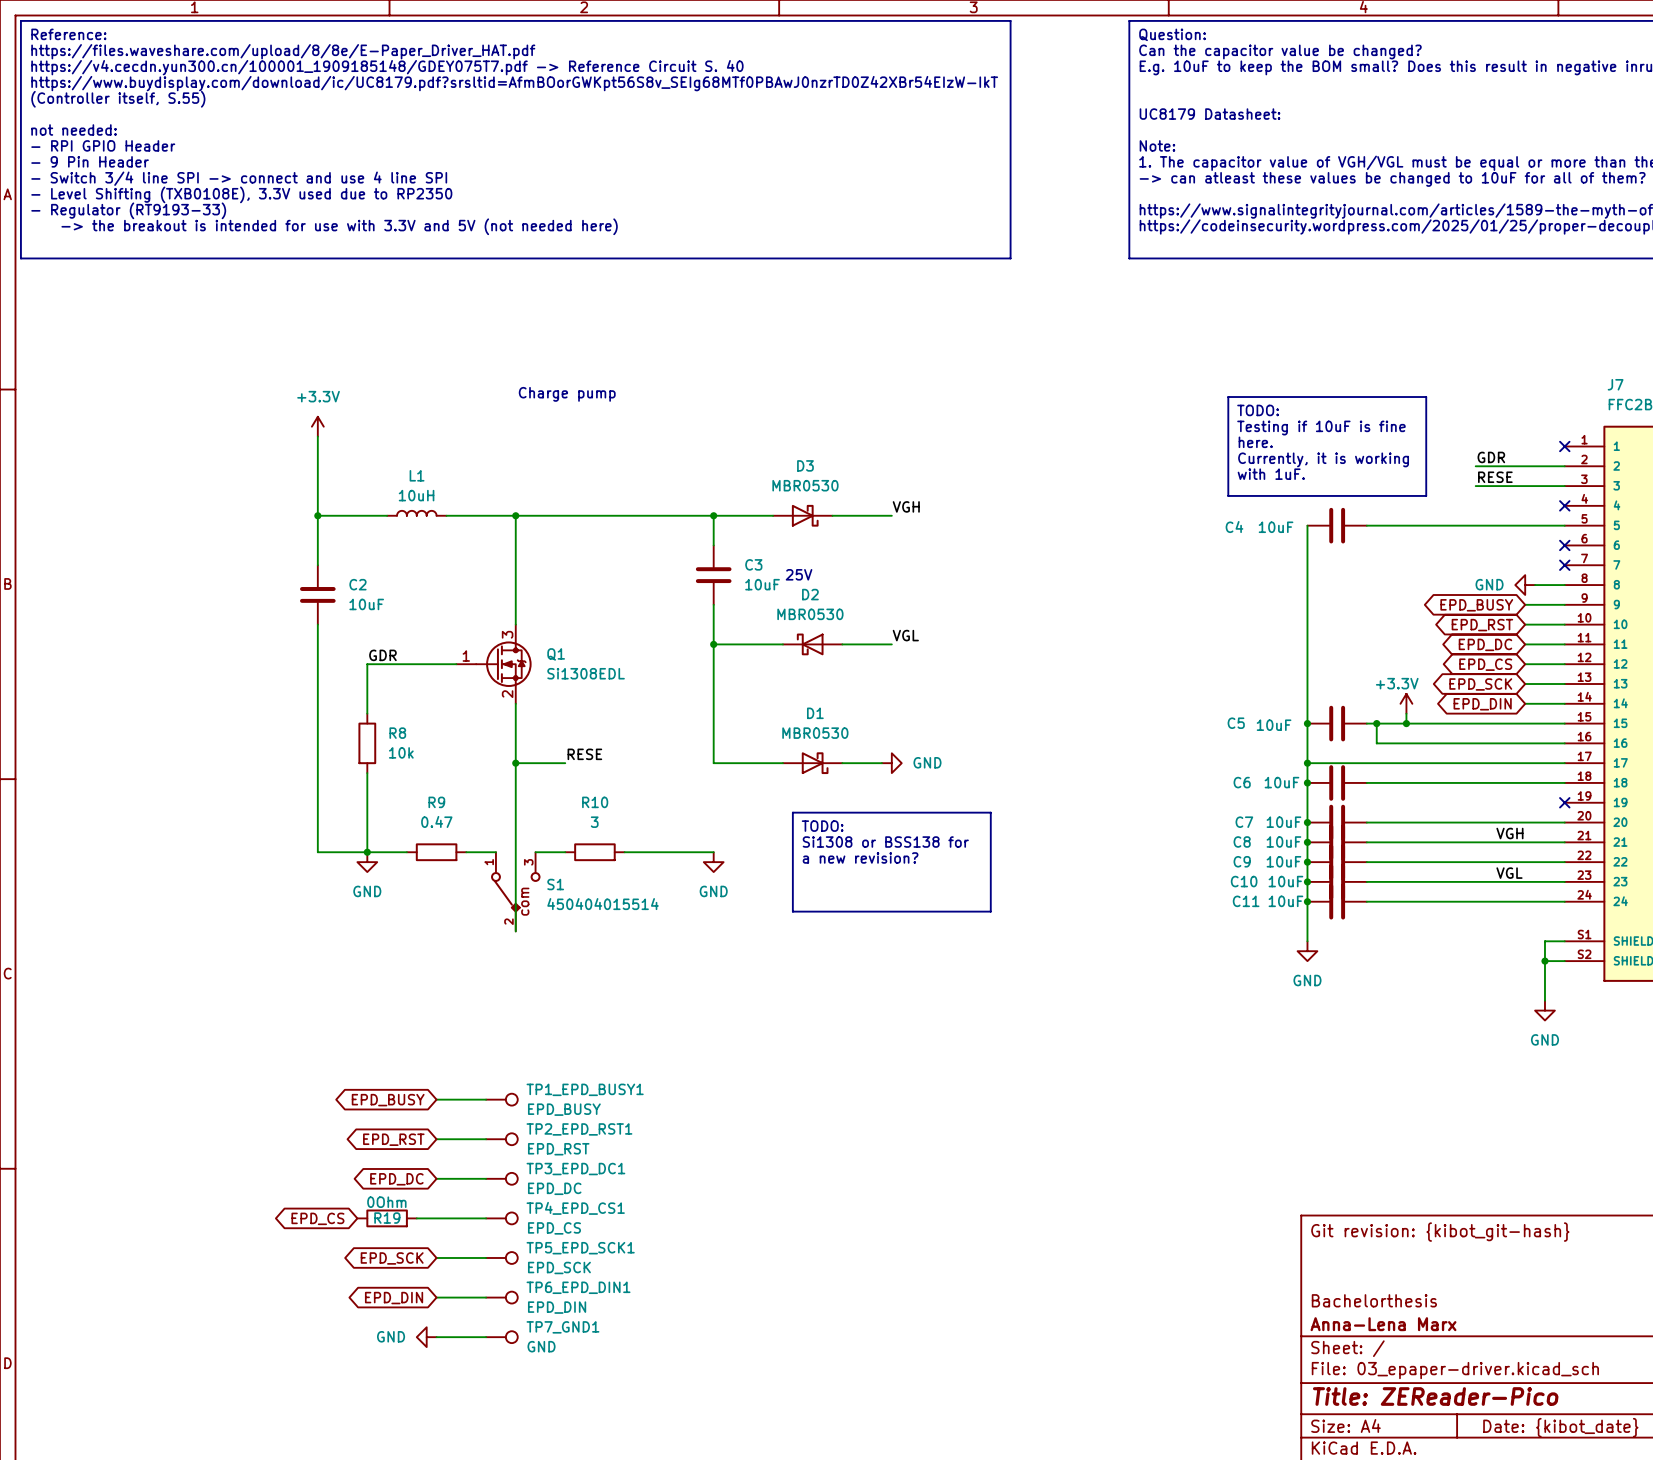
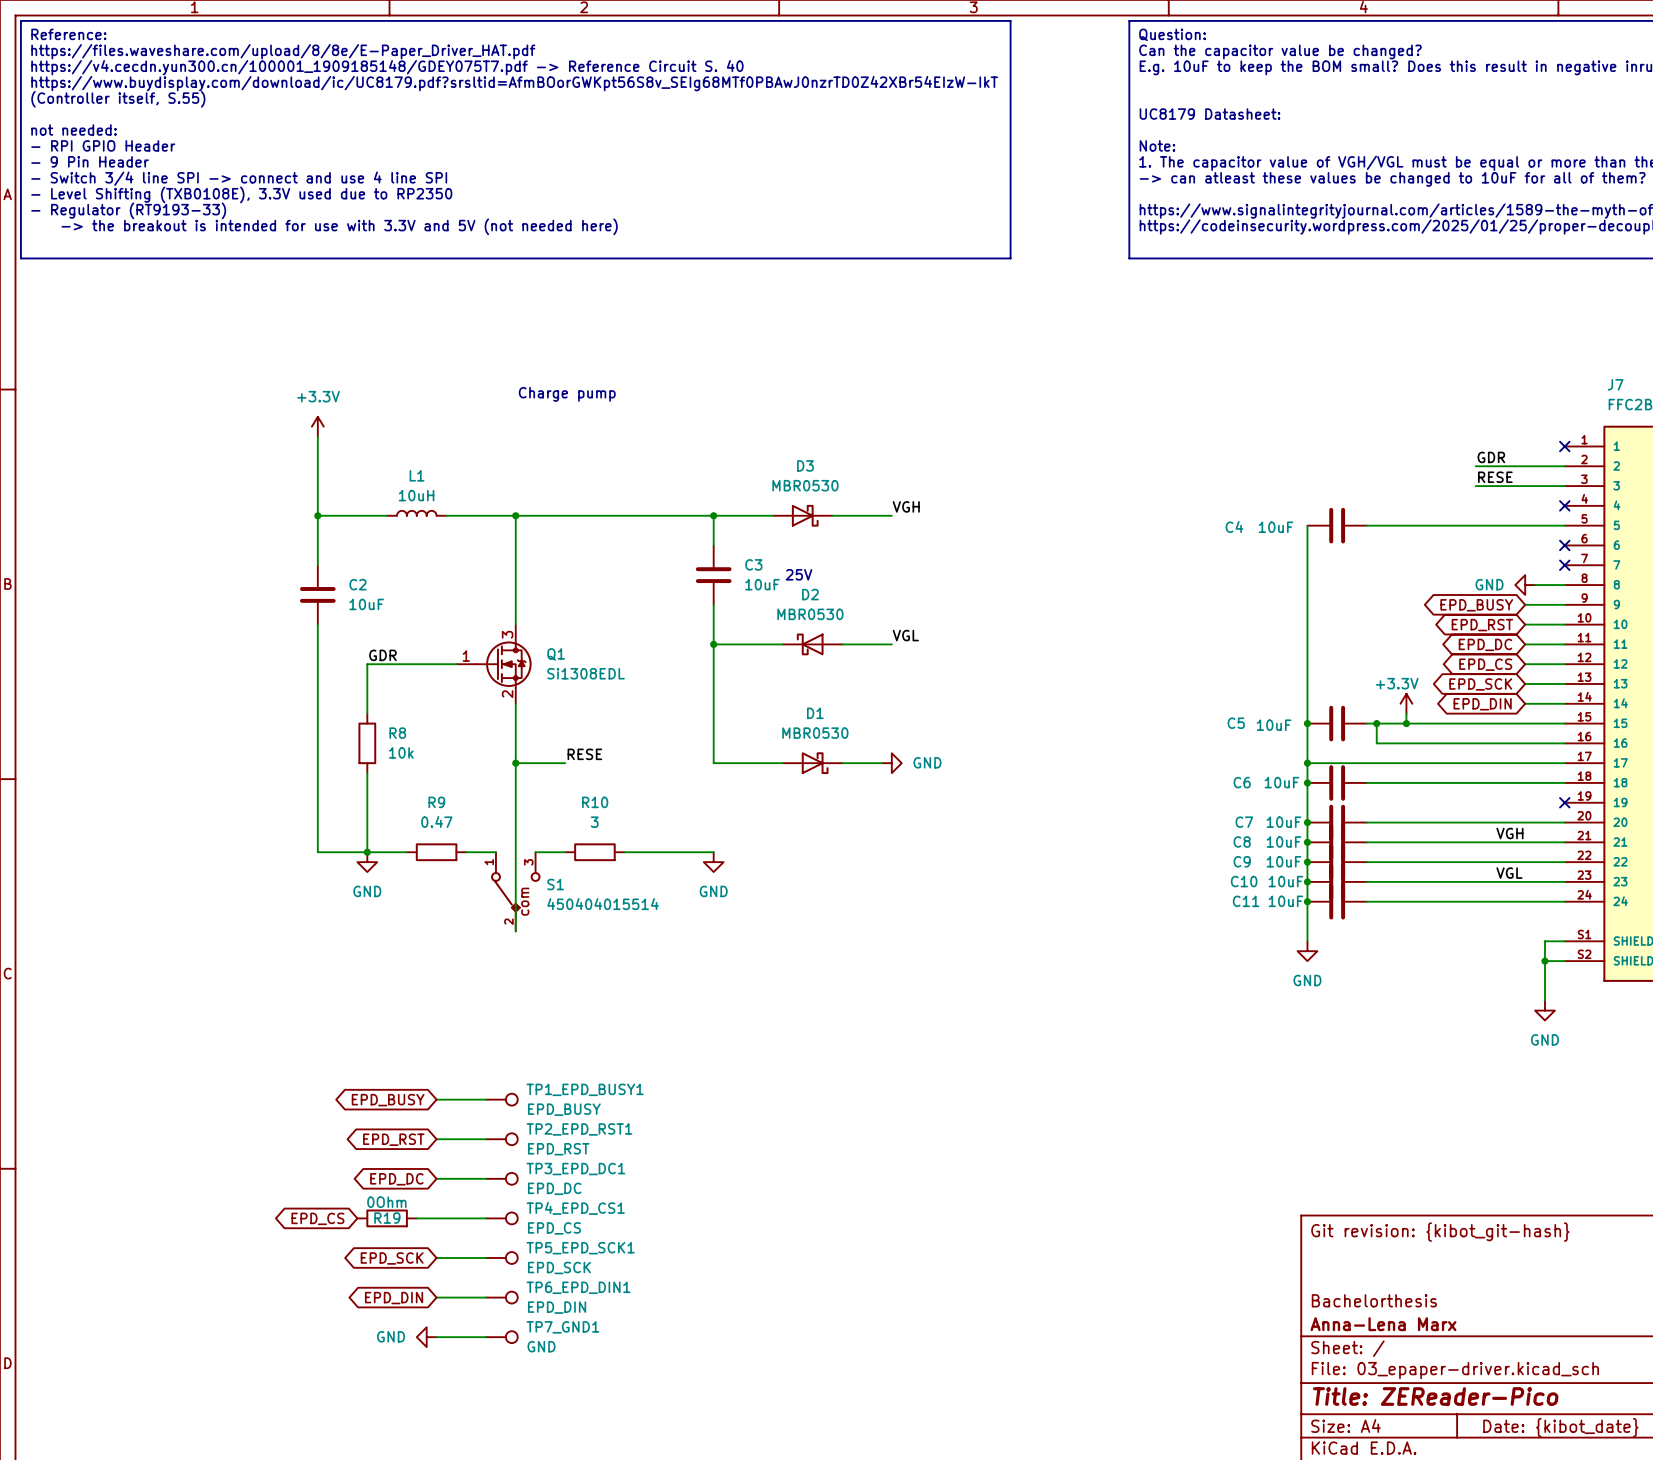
line: (1228, 397) (1426, 397) (1426, 495) (1228, 495) (1228, 397) -> none
text: TODO: (1258, 410) -> none
text: Testing if 10uF is fine (1321, 428) -> none
text: here. (1255, 442) -> none
text: Currently, it is working (1323, 459) -> none
text: with 1uF. (1271, 474) -> none
line: (792, 812) (990, 812) (990, 911) (792, 911) (792, 812) -> none
text: TODO: (822, 826) -> none
text: Si1308 or BSS138 for (885, 842) -> none
text: a new revision? (860, 857) -> none

